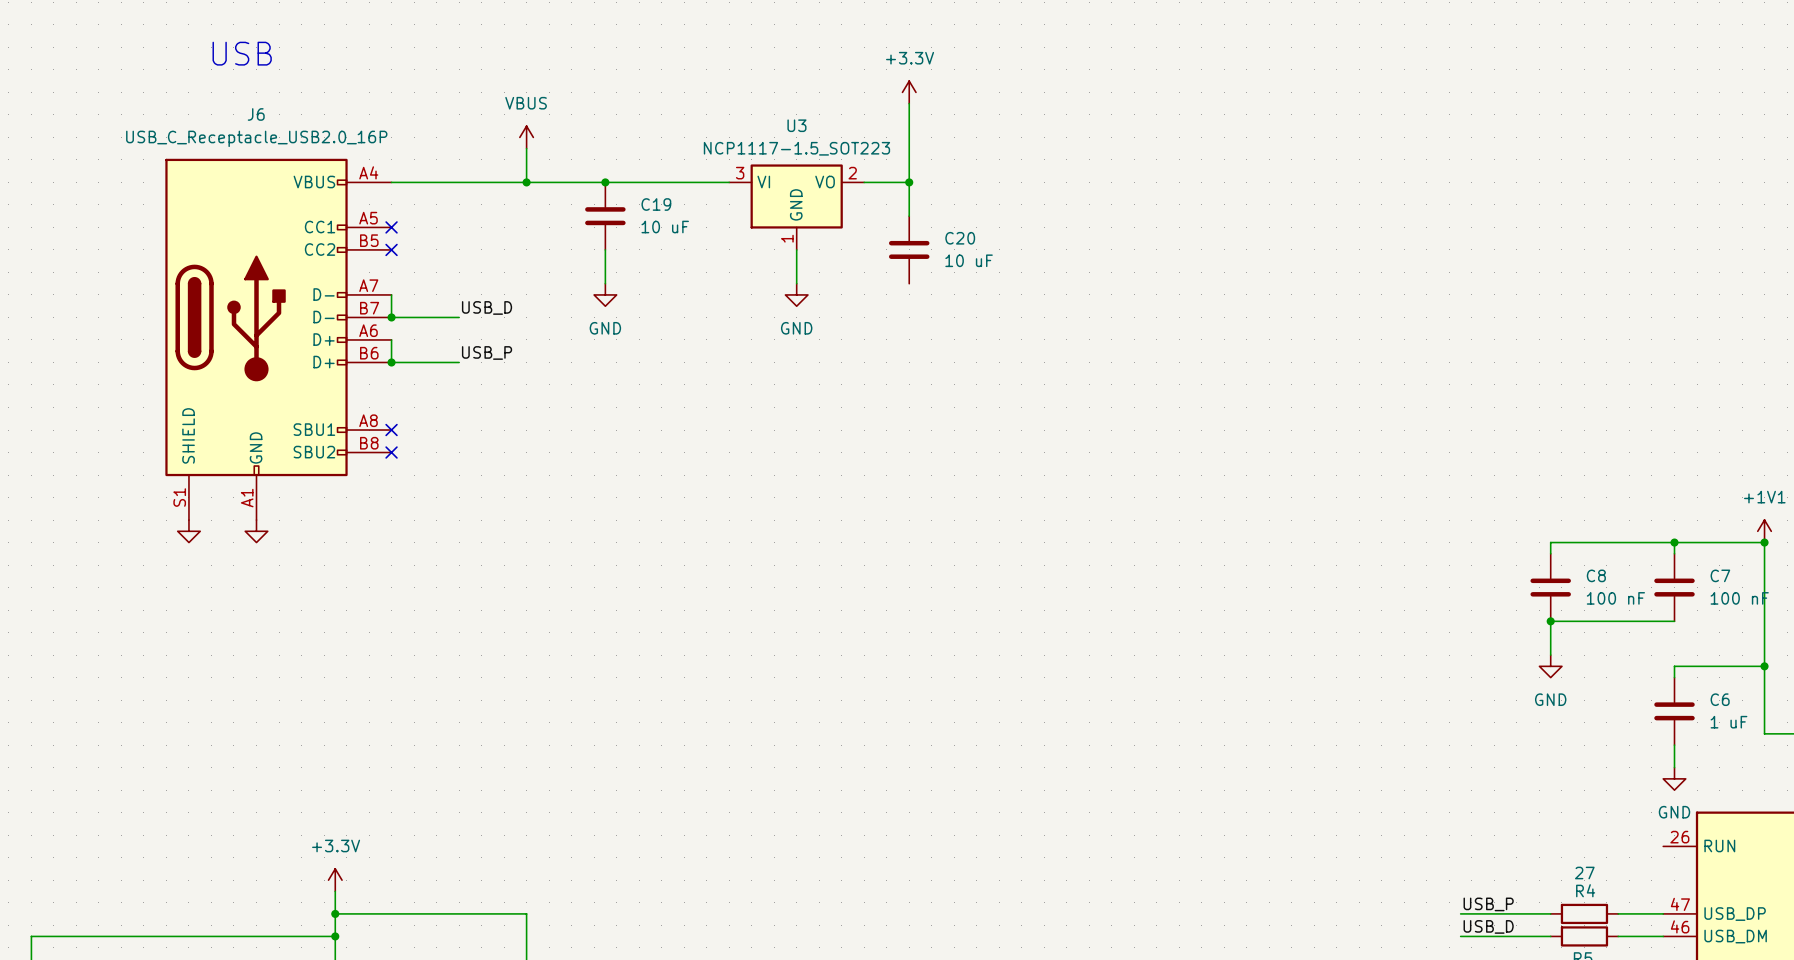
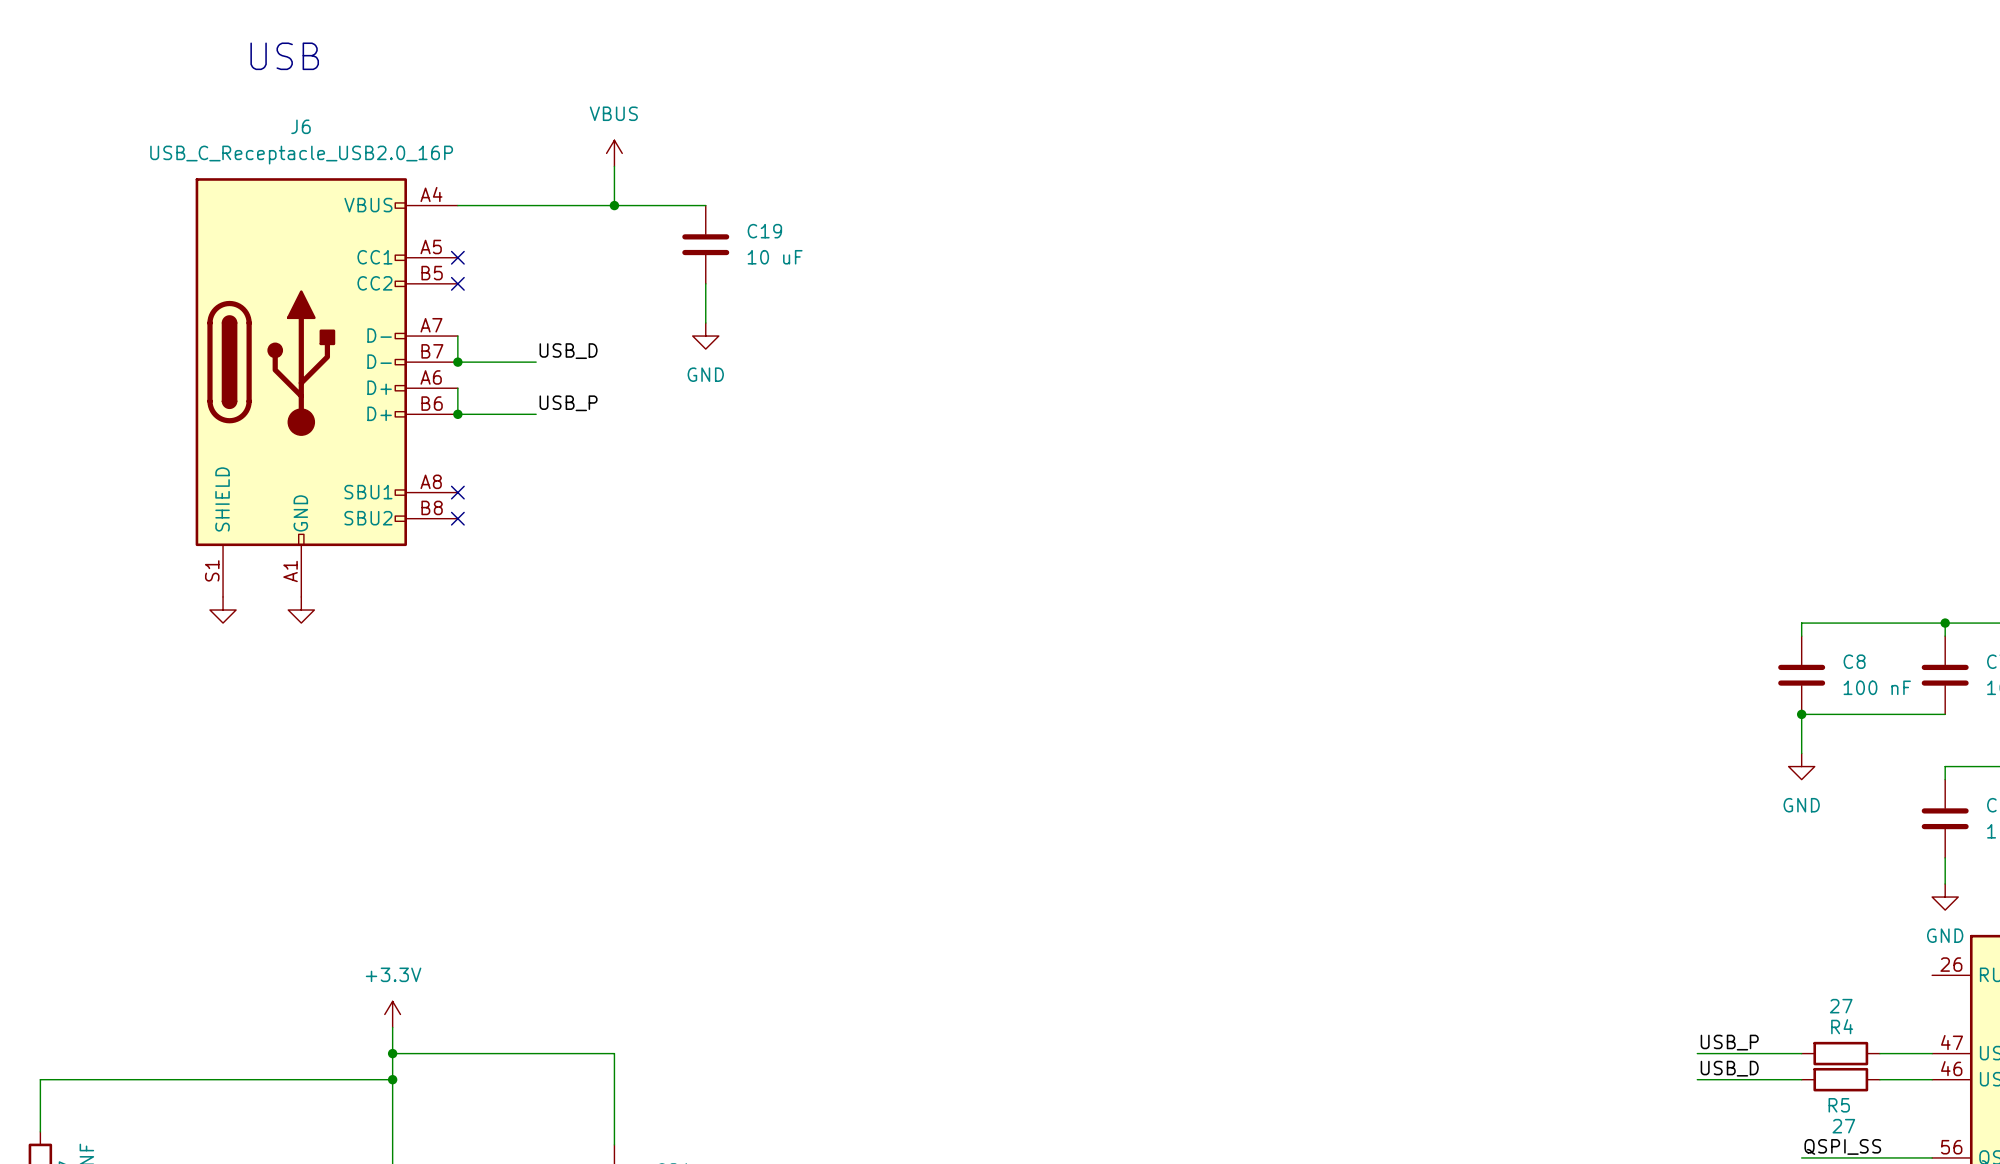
power symbol: +3.3V (909, 92) -> none
wire: (909, 103) (909, 216) -> none
wire: (605, 182) (729, 182) -> none
junction: (605, 182) -> none
wire: (864, 182) (909, 182) -> none
junction: (909, 182) -> none
U3: NCP1117-1.5_SOT223 (796, 207) -> none
wire: (796, 249) (796, 283) -> none
C20: 10 uF (909, 249) -> none
power symbol: GND (796, 294) -> none

